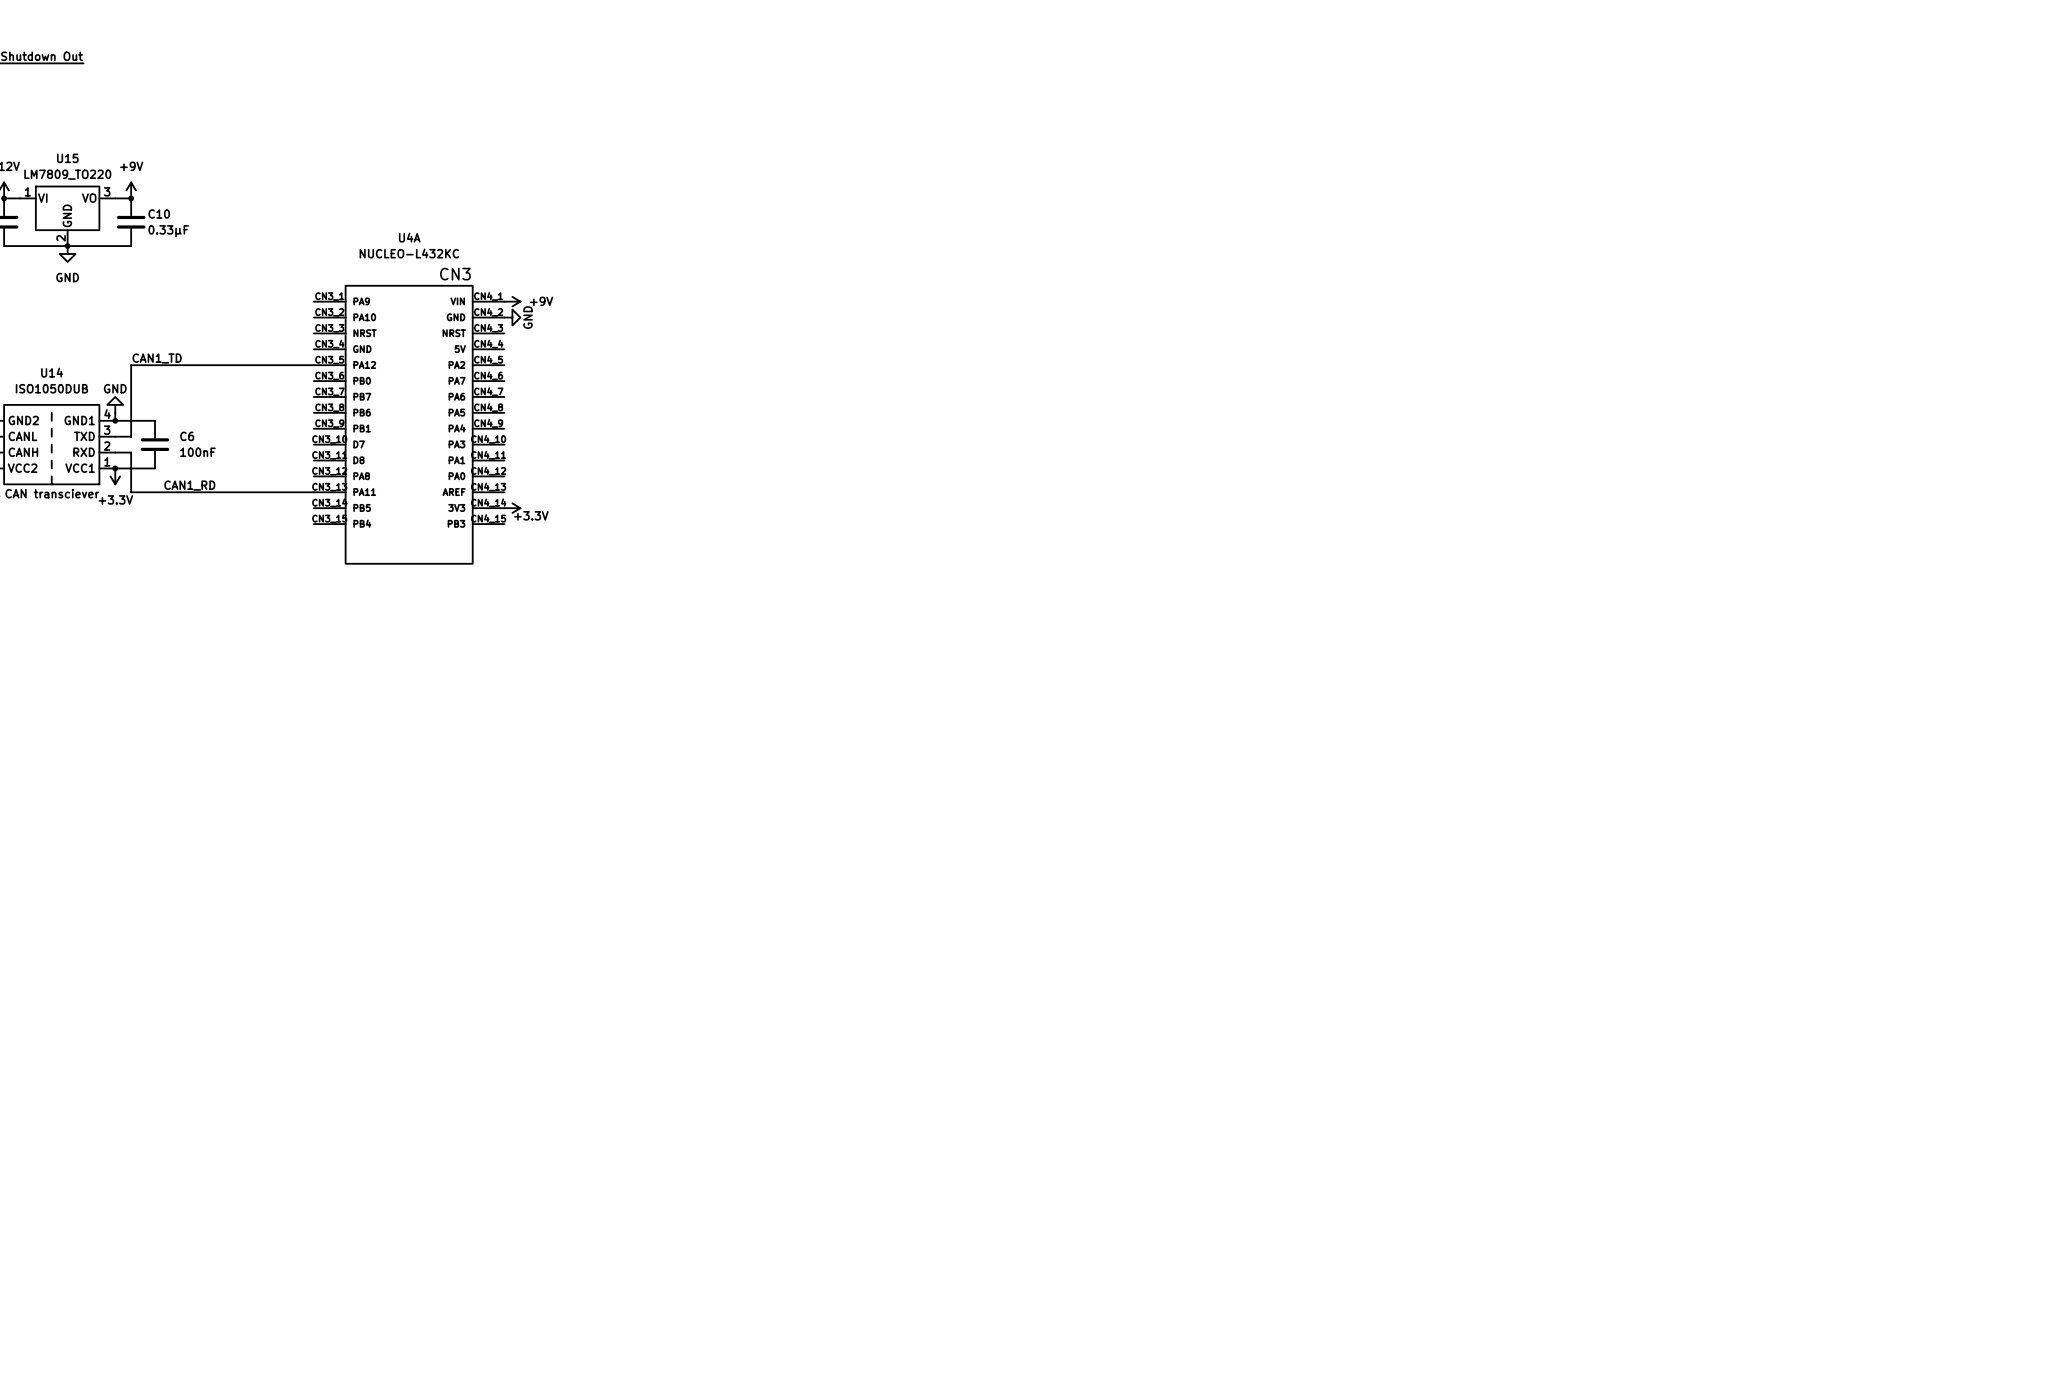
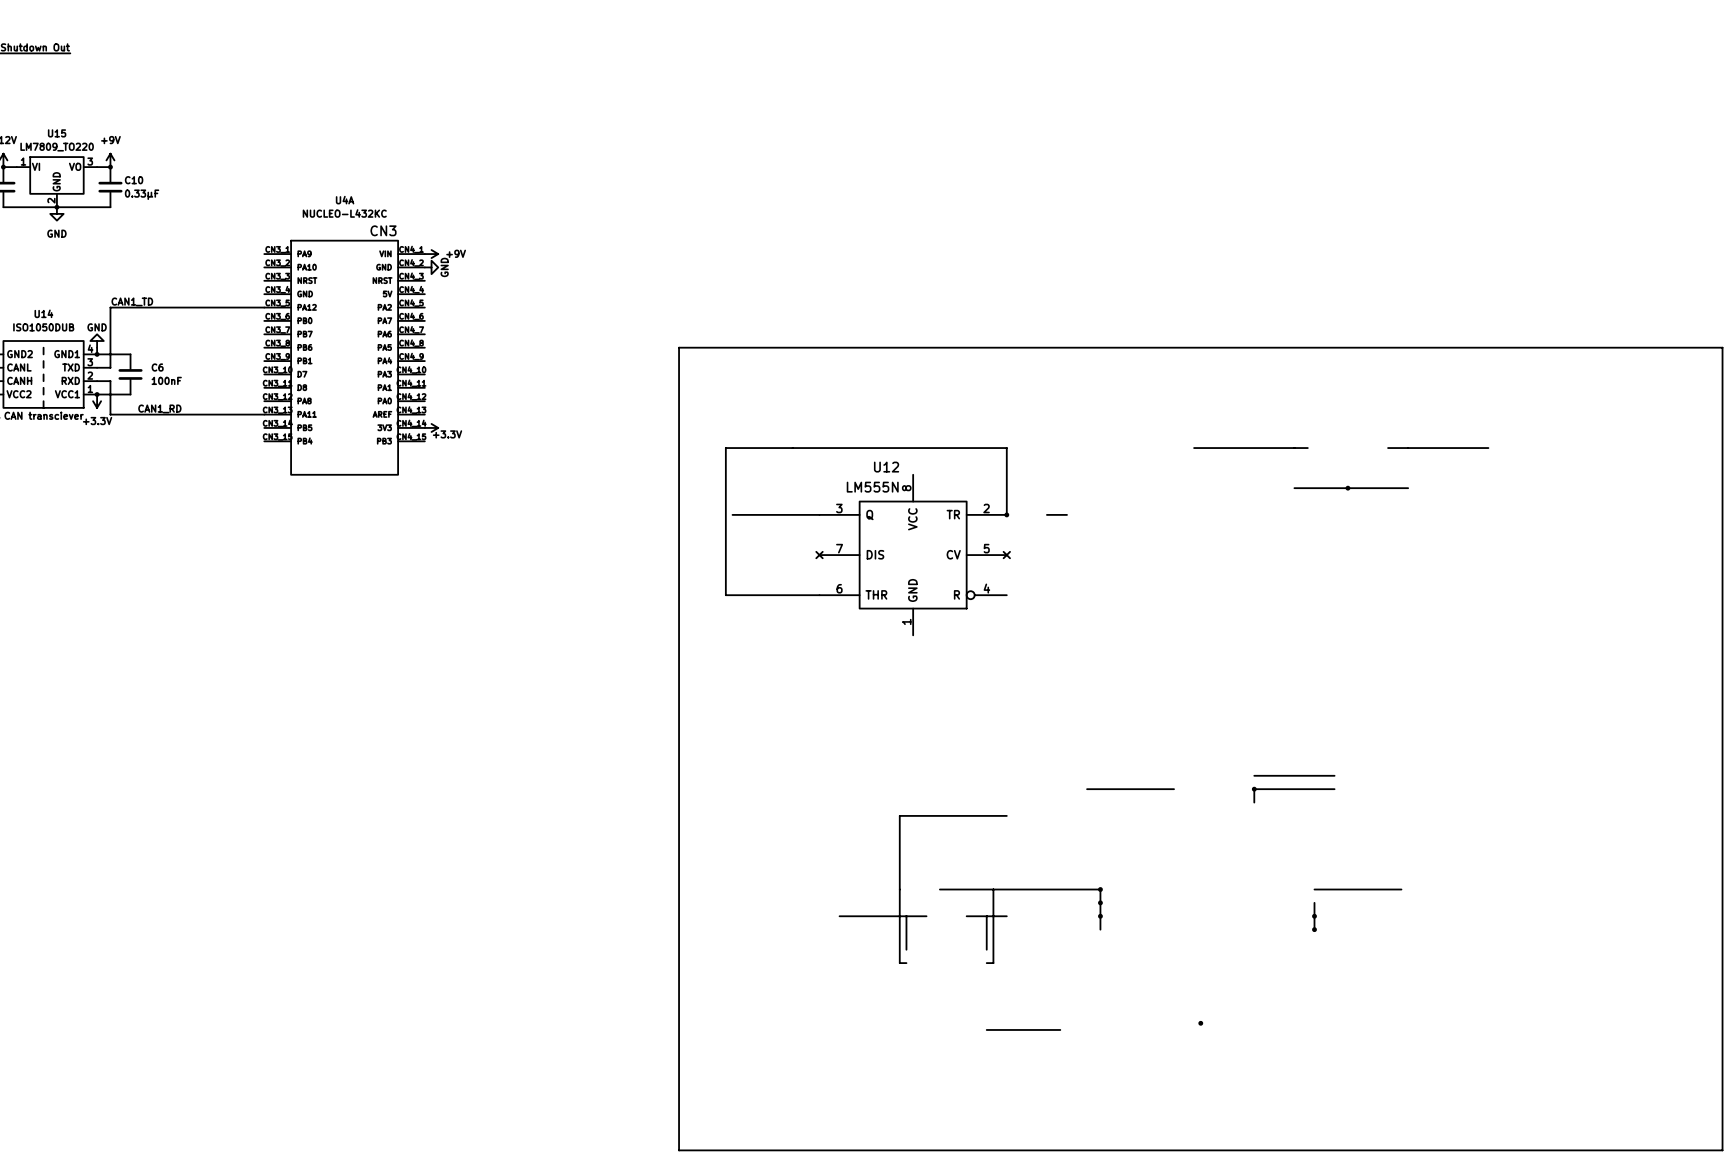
wire: none -> (679, 347) (679, 1150) (1722, 1150) (1722, 347) (679, 347)
wire: none -> (1194, 448) (1307, 448)
wire: none -> (1388, 448) (1488, 448)
wire: none -> (1294, 488) (1408, 488)
junction: none -> (1347, 488)
wire: none -> (732, 514) (819, 514)
wire: none -> (1006, 514) (1006, 448) (725, 448) (725, 595) (819, 595)
junction: none -> (1006, 514)
wire: none -> (1046, 514) (1067, 514)
no-connect mark: none -> (819, 555)
U12: none -> LM555N (913, 555)
no-connect mark: none -> (1006, 555)
wire: none -> (1254, 775) (1334, 775)
wire: none -> (1087, 789) (1174, 789)
junction: none -> (1254, 789)
wire: none -> (1334, 789) (1254, 789) (1254, 802)
wire: none -> (1006, 815) (899, 815) (899, 963) (906, 963)
wire: none -> (939, 889) (1100, 889) (1100, 929)
wire: none -> (993, 889) (993, 963) (986, 963)
junction: none -> (1100, 889)
wire: none -> (1314, 889) (1401, 889)
junction: none -> (1100, 902)
wire: none -> (1314, 902) (1314, 929)
wire: none -> (839, 916) (926, 916)
wire: none -> (906, 916) (906, 949)
wire: none -> (966, 916) (1006, 916)
wire: none -> (986, 916) (986, 949)
junction: none -> (1100, 916)
junction: none -> (1314, 916)
junction: none -> (1314, 929)
junction: none -> (1200, 1023)
wire: none -> (986, 1029) (1060, 1029)

